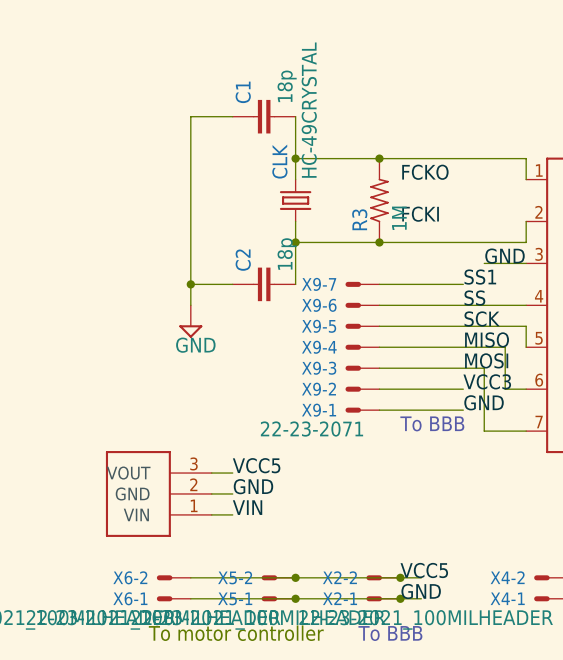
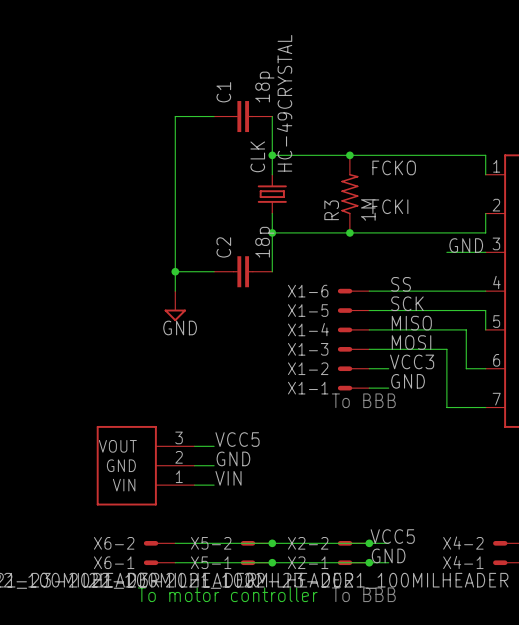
label: SS1 (480, 277) -> none
X9-7: (362, 284) -> none
wire: (379, 284) (463, 284) -> none
label position: SS (474, 298) -> SS (401, 284)
X9-6: (362, 305) -> none
X1-6: none -> (353, 291)
label position: SCK (482, 318) -> SCK (407, 303)
X9-5: (362, 326) -> none
X1-5: none -> (353, 310)
label position: MISO (487, 339) -> MISO (411, 323)
X9-4: (362, 347) -> none
X1-4: none -> (353, 329)
label position: MOSI (486, 360) -> MOSI (411, 342)
X9-3: (362, 368) -> none
X1-3: none -> (353, 349)
label position: VCC3 (487, 381) -> VCC3 (412, 361)
X9-2: (362, 389) -> none
X1-2: none -> (353, 368)
wire: (421, 389) (463, 389) -> none
label position: GND (484, 402) -> GND (408, 381)
X9-1: 22-23-2071 (362, 410) -> none
X1-1: none -> (353, 388)
wire: (421, 410) (463, 410) -> none
text position: To BBB (432, 423) -> To BBB (363, 400)

